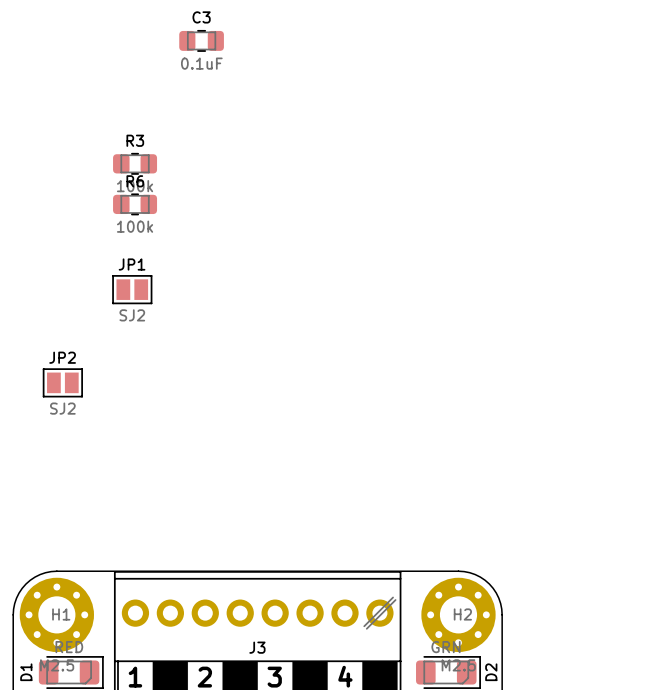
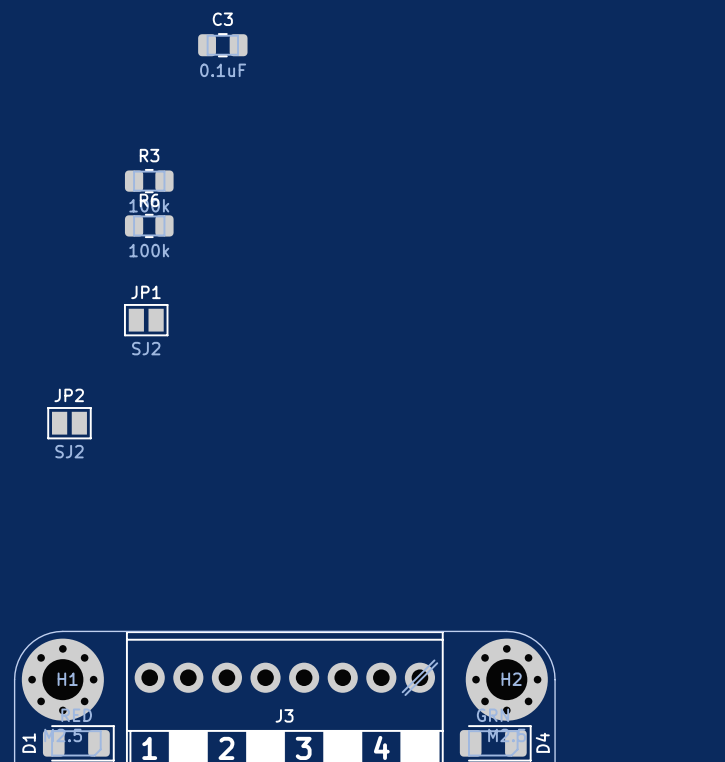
D2 name: D2 (491, 672) -> D4 (542, 742)

